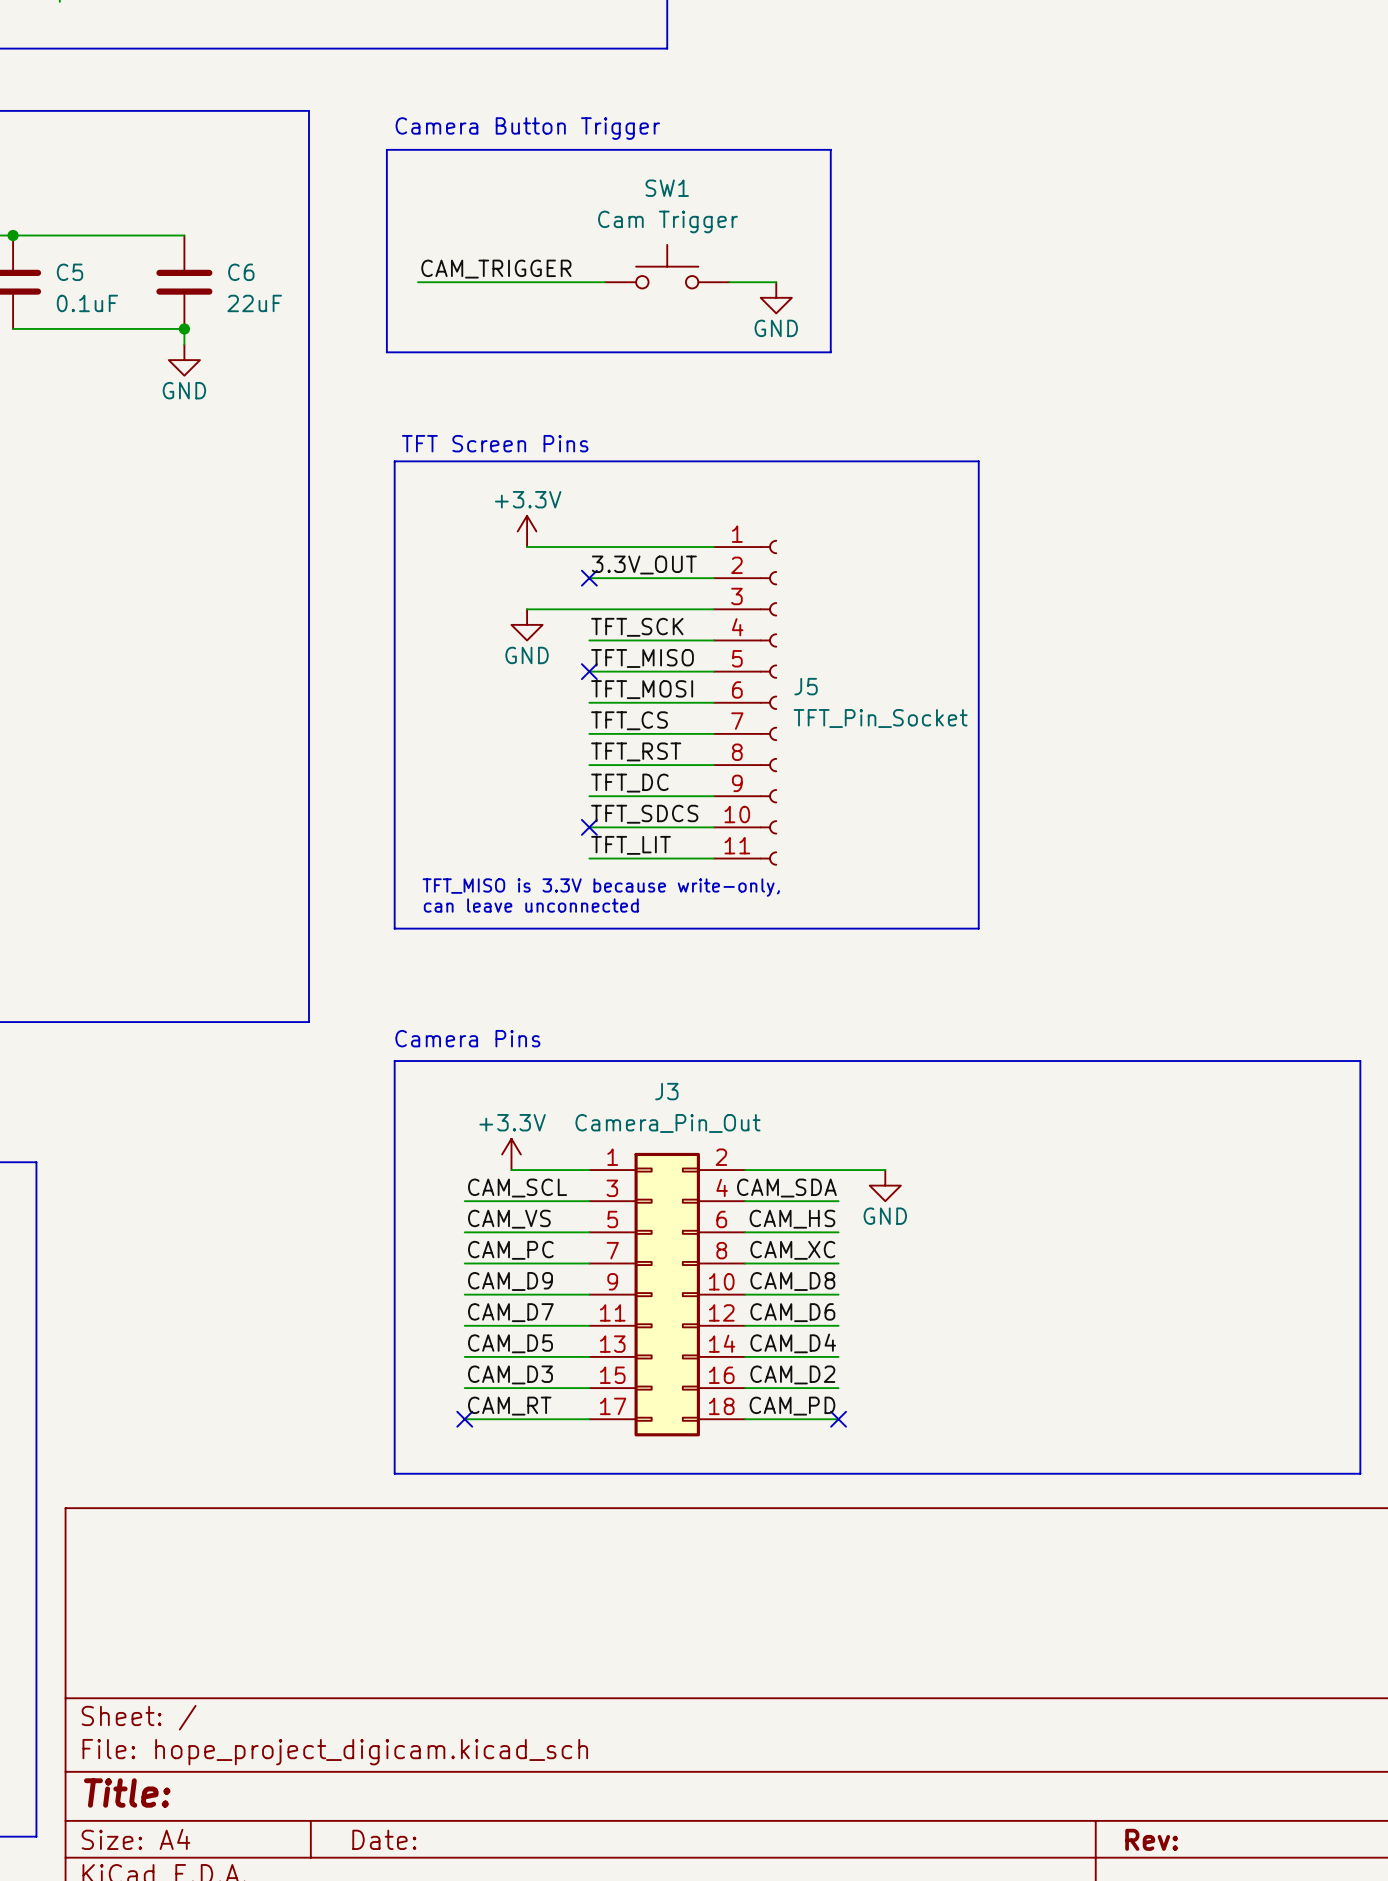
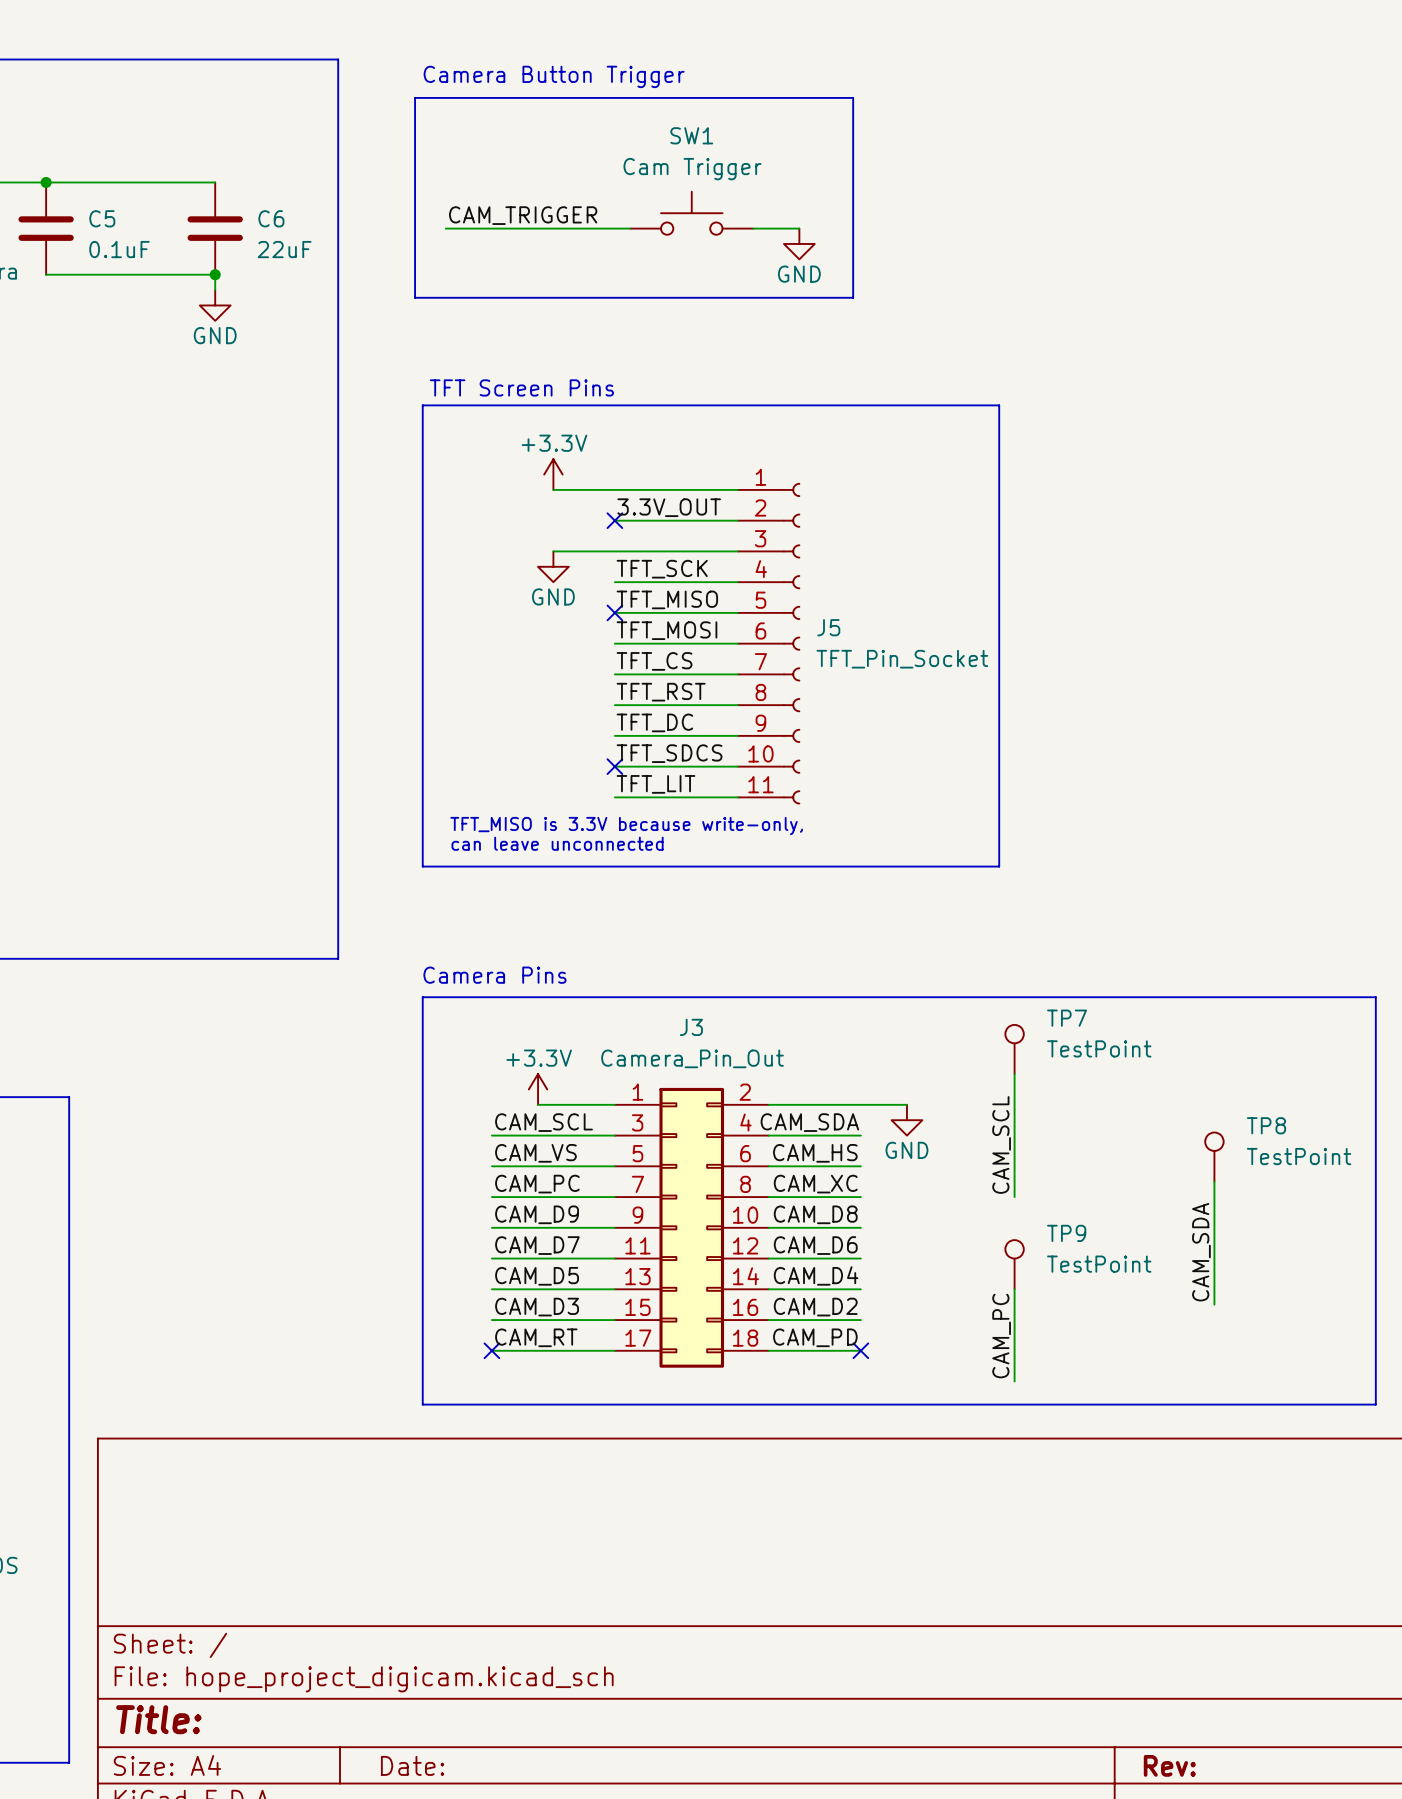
TP7: none -> TestPoint (1014, 1049)
wire: none -> (1014, 1074) (1014, 1197)
label: none -> CAM_SCL (1001, 1144)
TP8: none -> TestPoint (1214, 1157)
wire: none -> (1214, 1181) (1214, 1304)
label: none -> CAM_SDA (1201, 1252)
TP9: none -> TestPoint (1014, 1264)
wire: none -> (1014, 1289) (1014, 1381)
label: none -> CAM_PC (1001, 1336)

